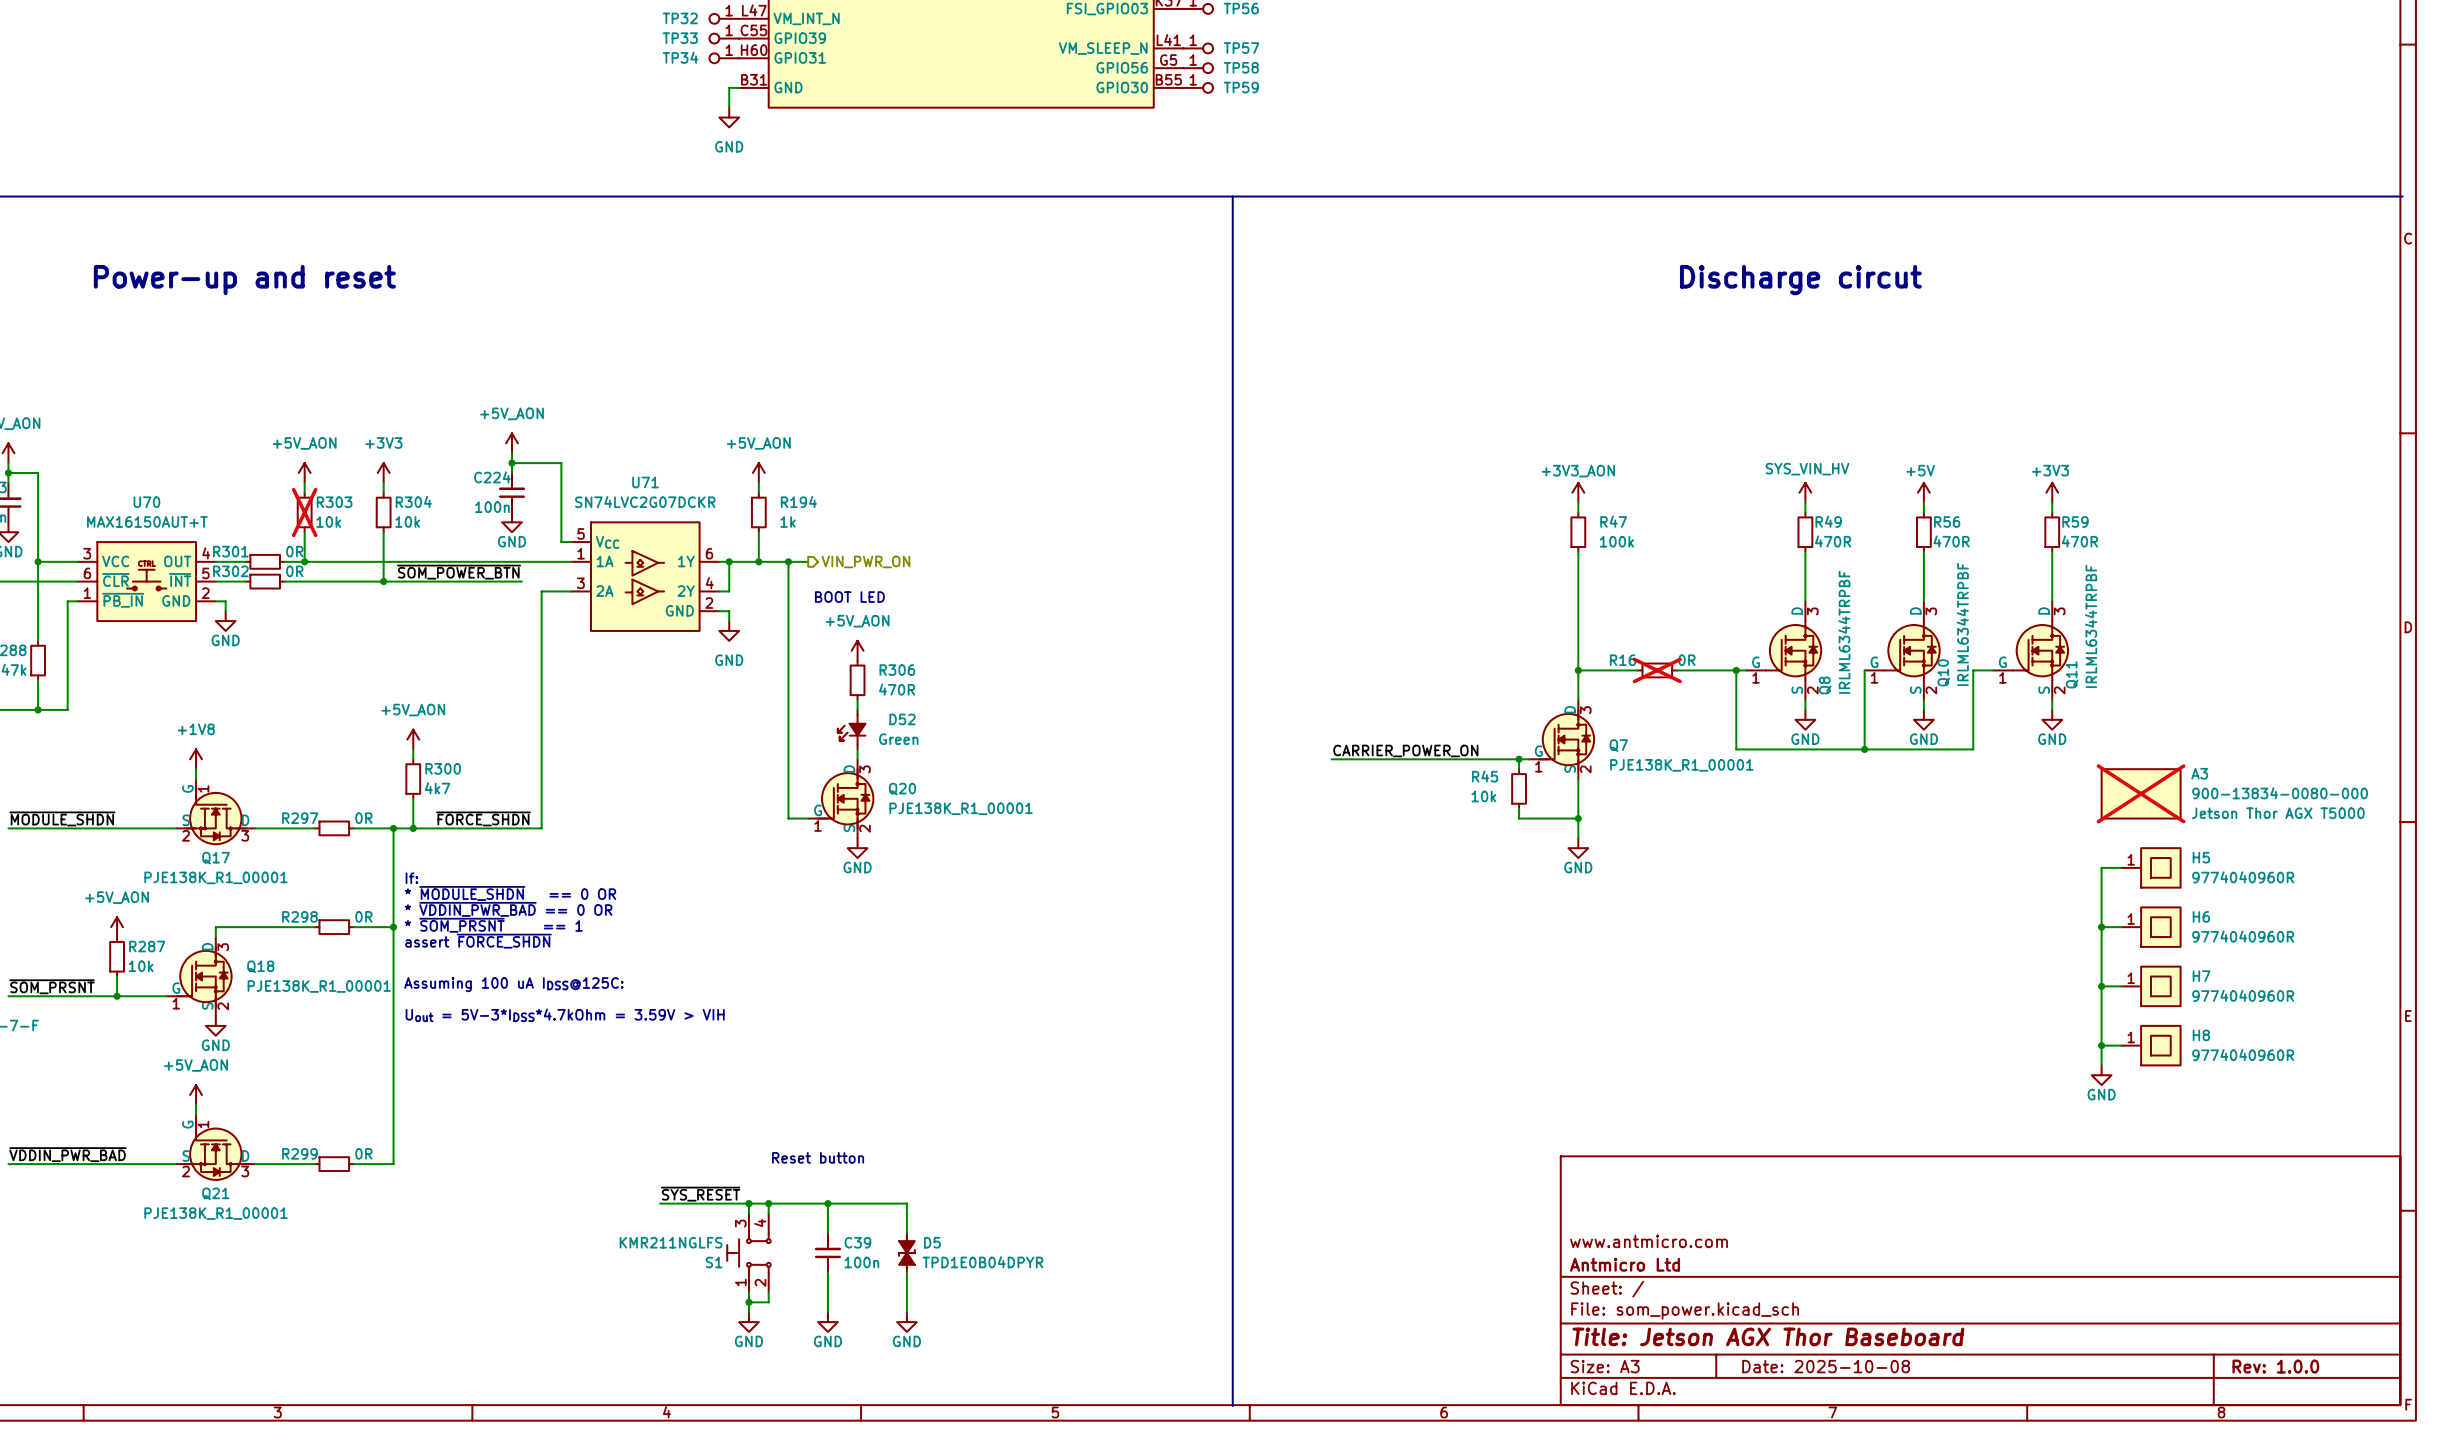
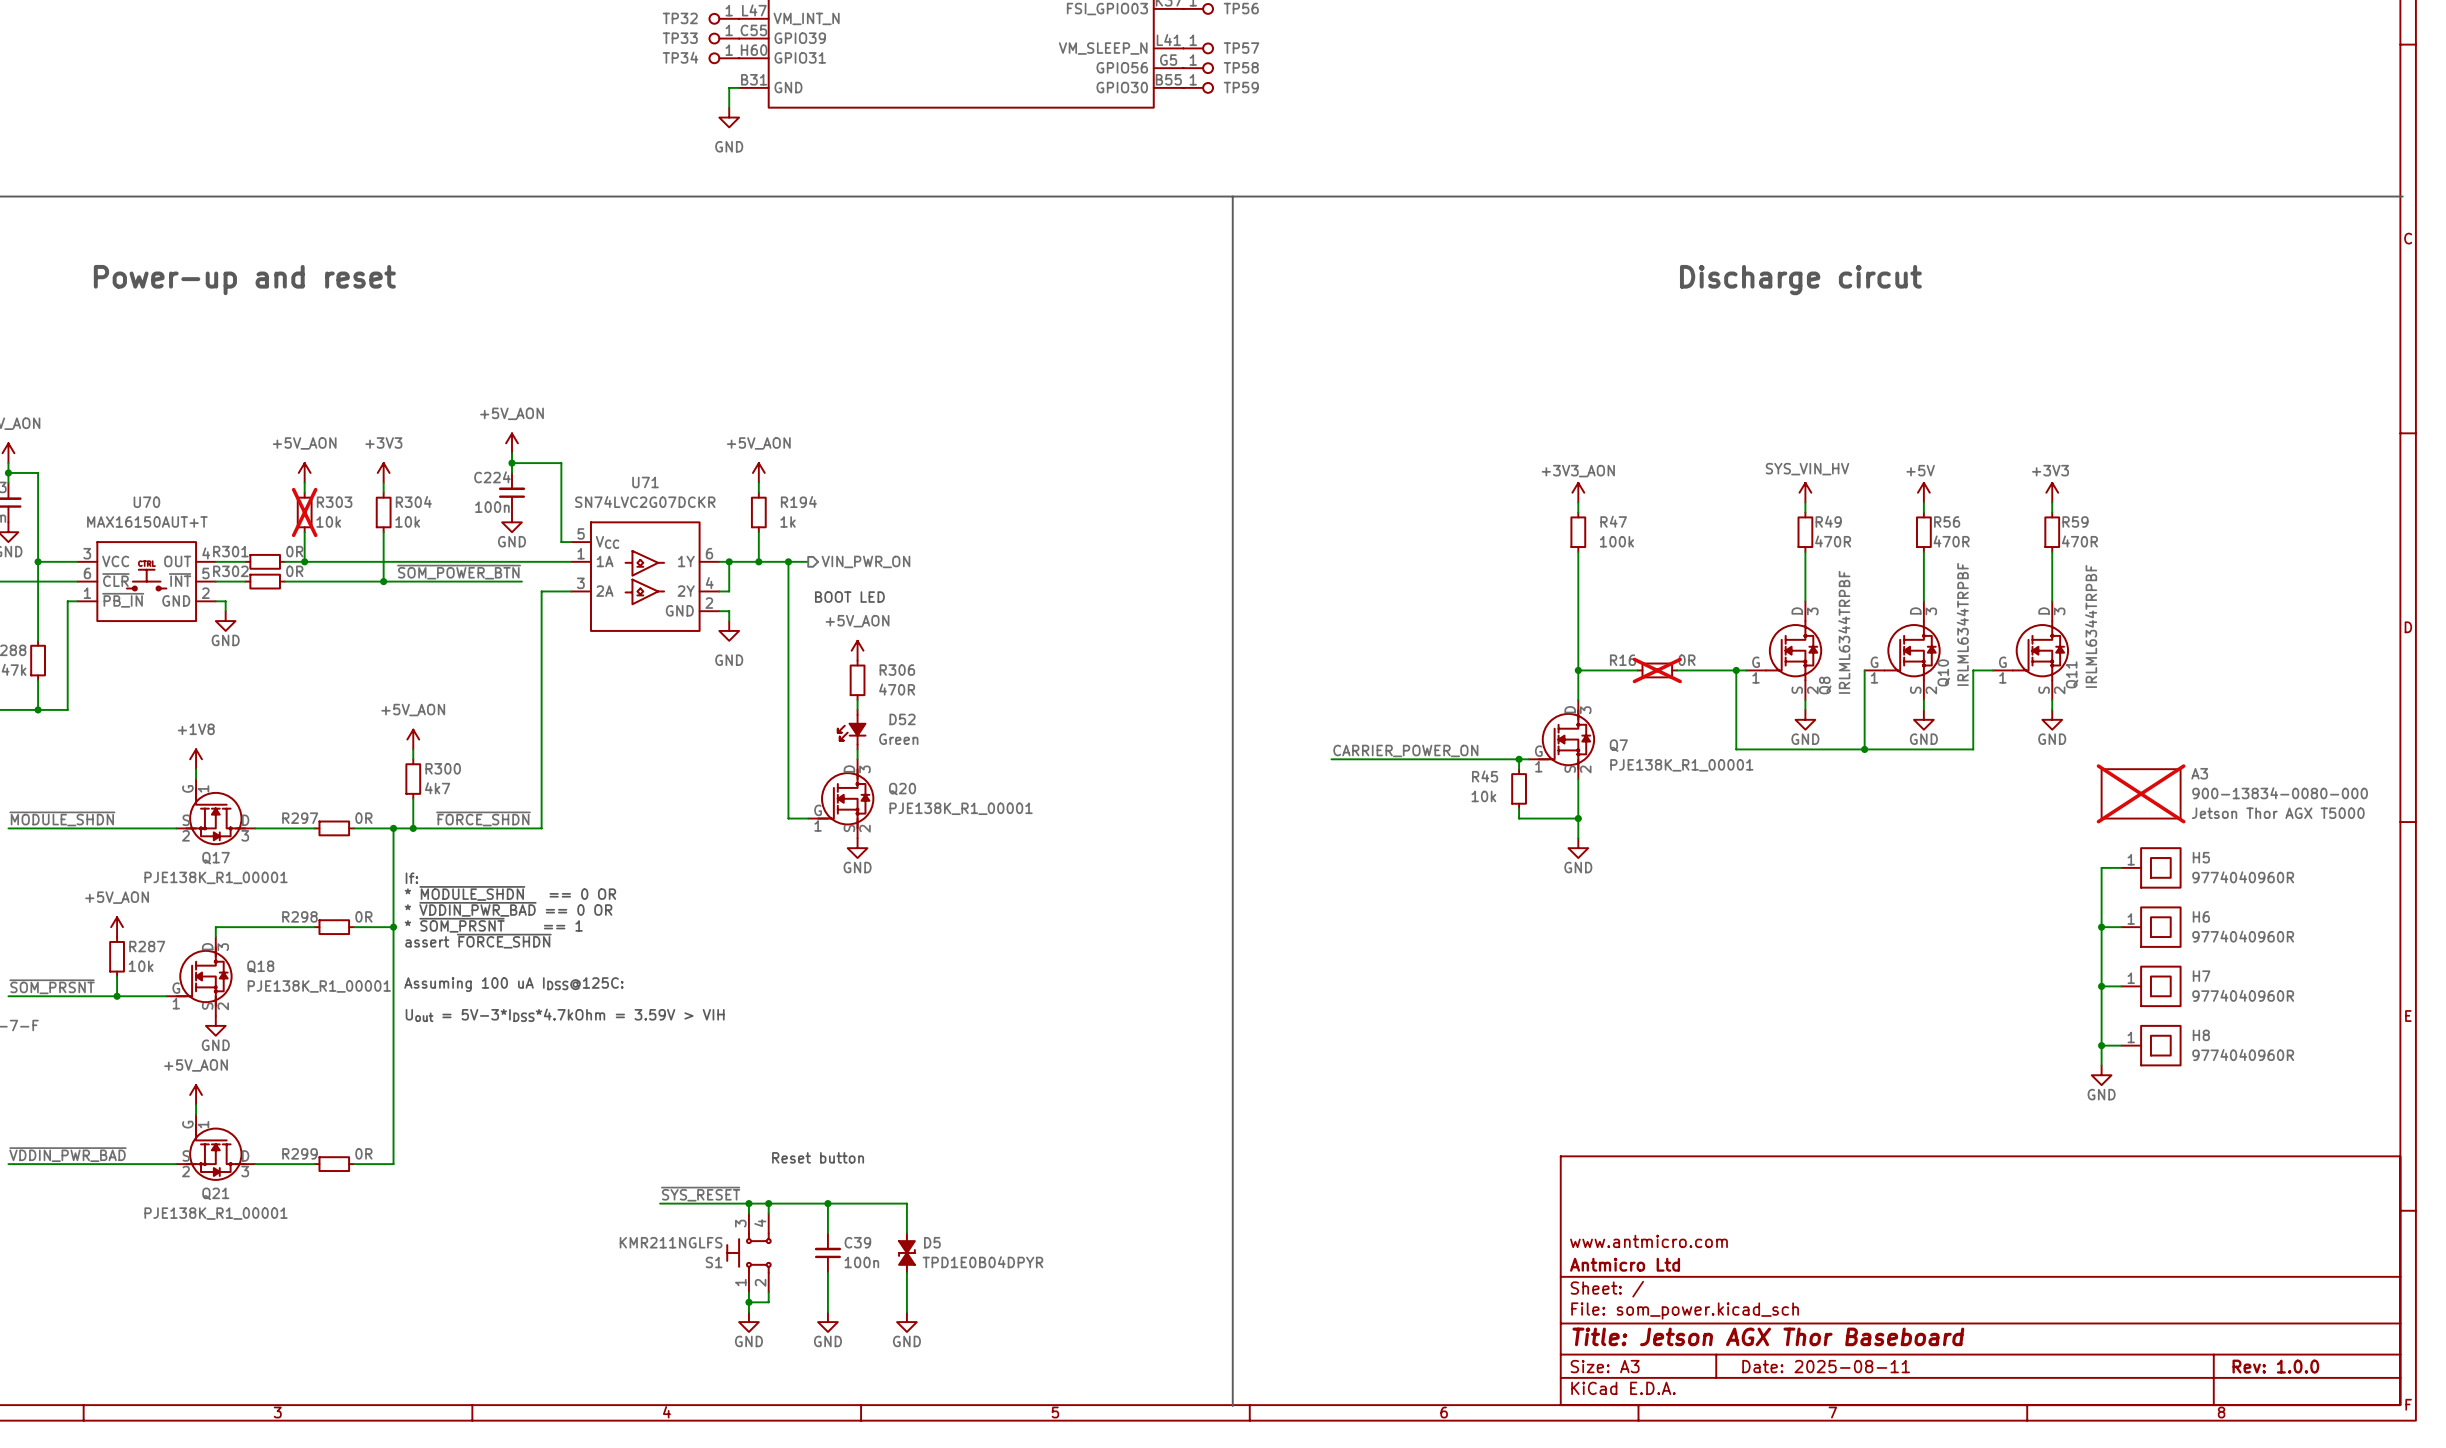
title block: Date: 2025-10-08 (1826, 1366) -> Date: 2025-08-11 (1826, 1366)

